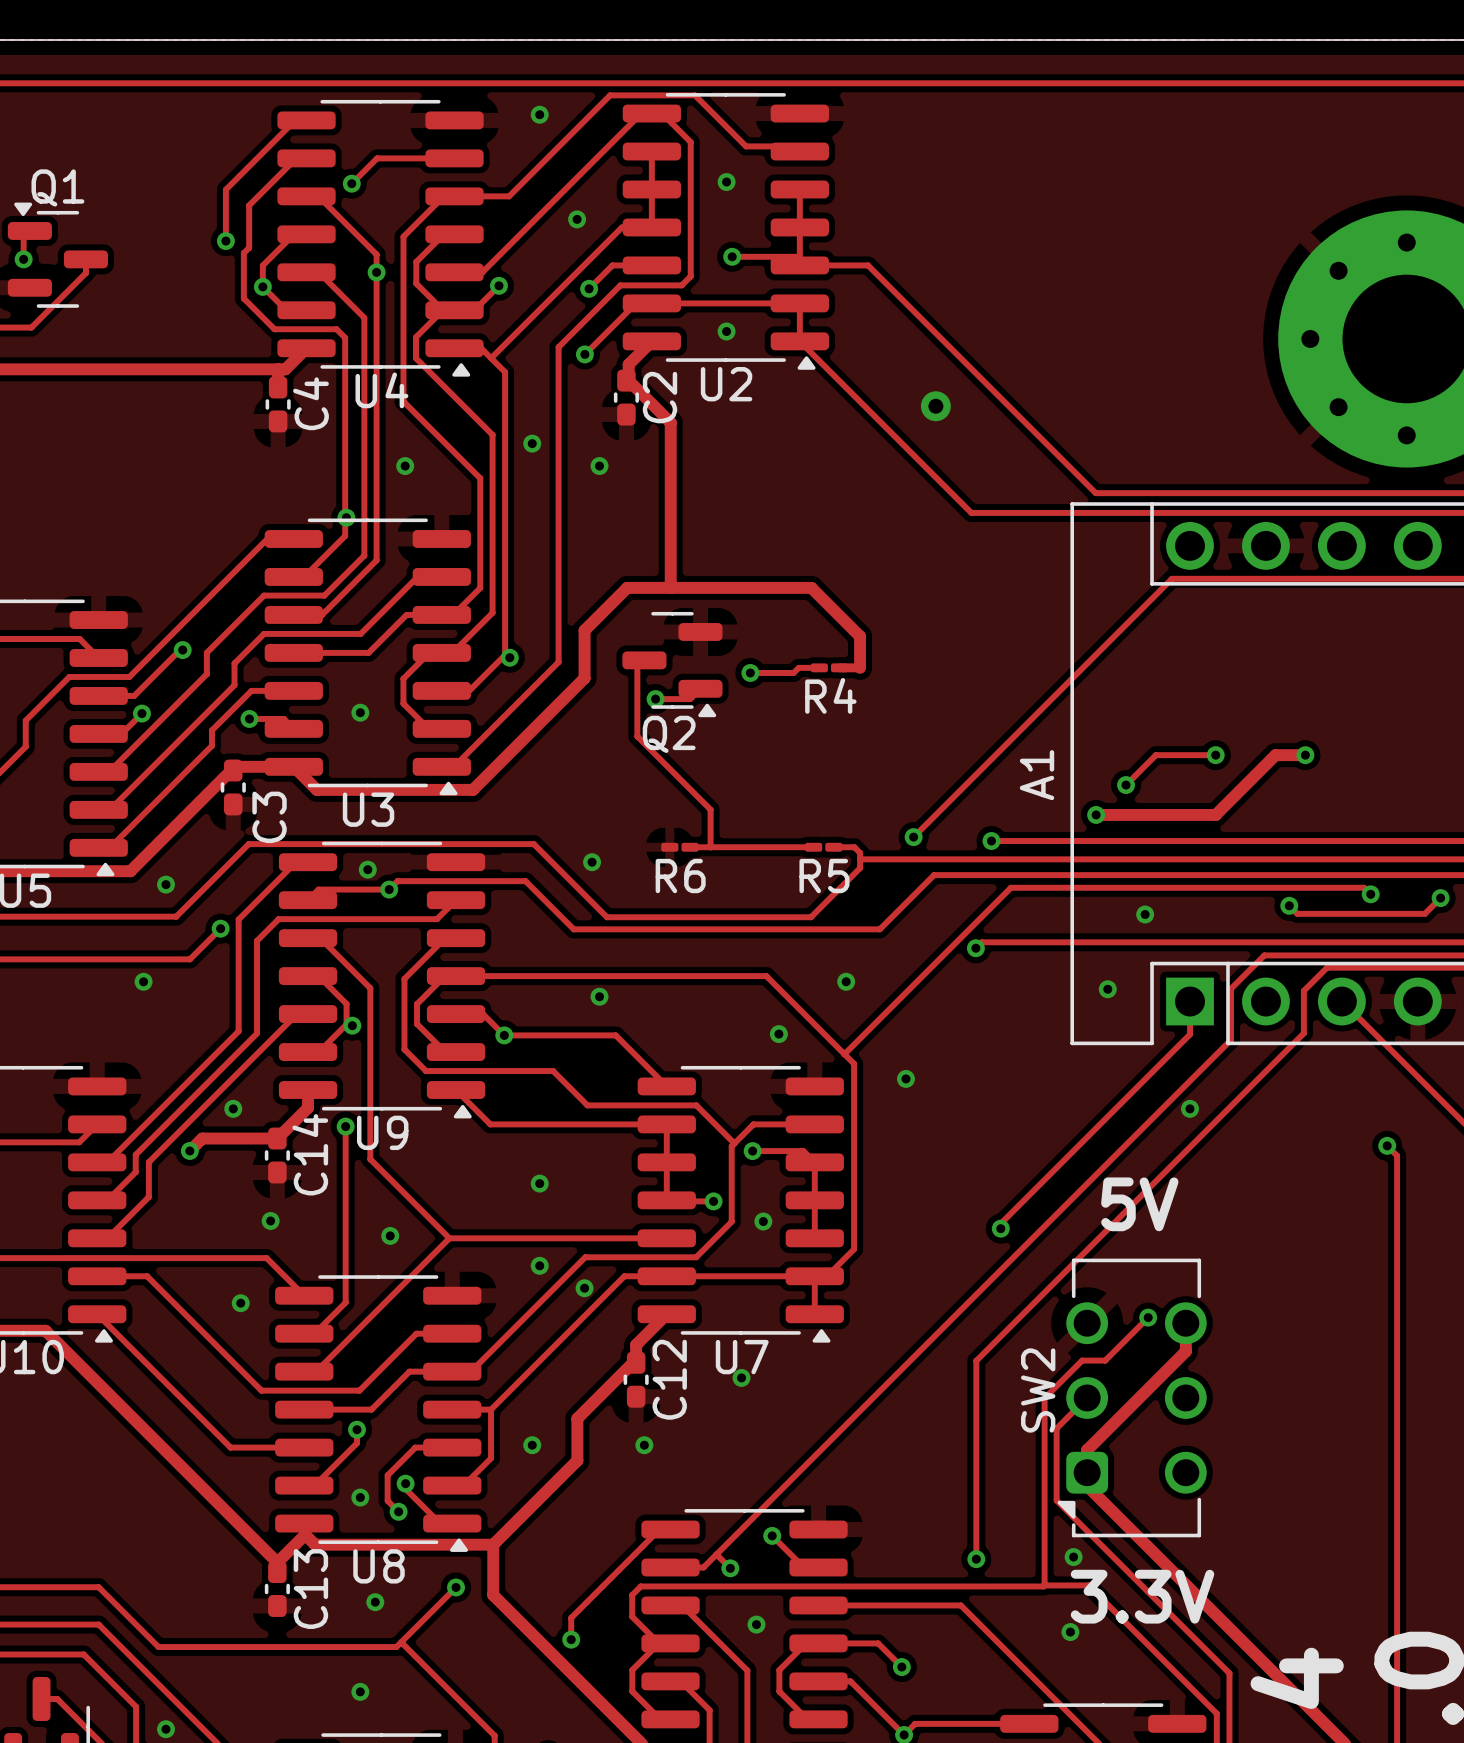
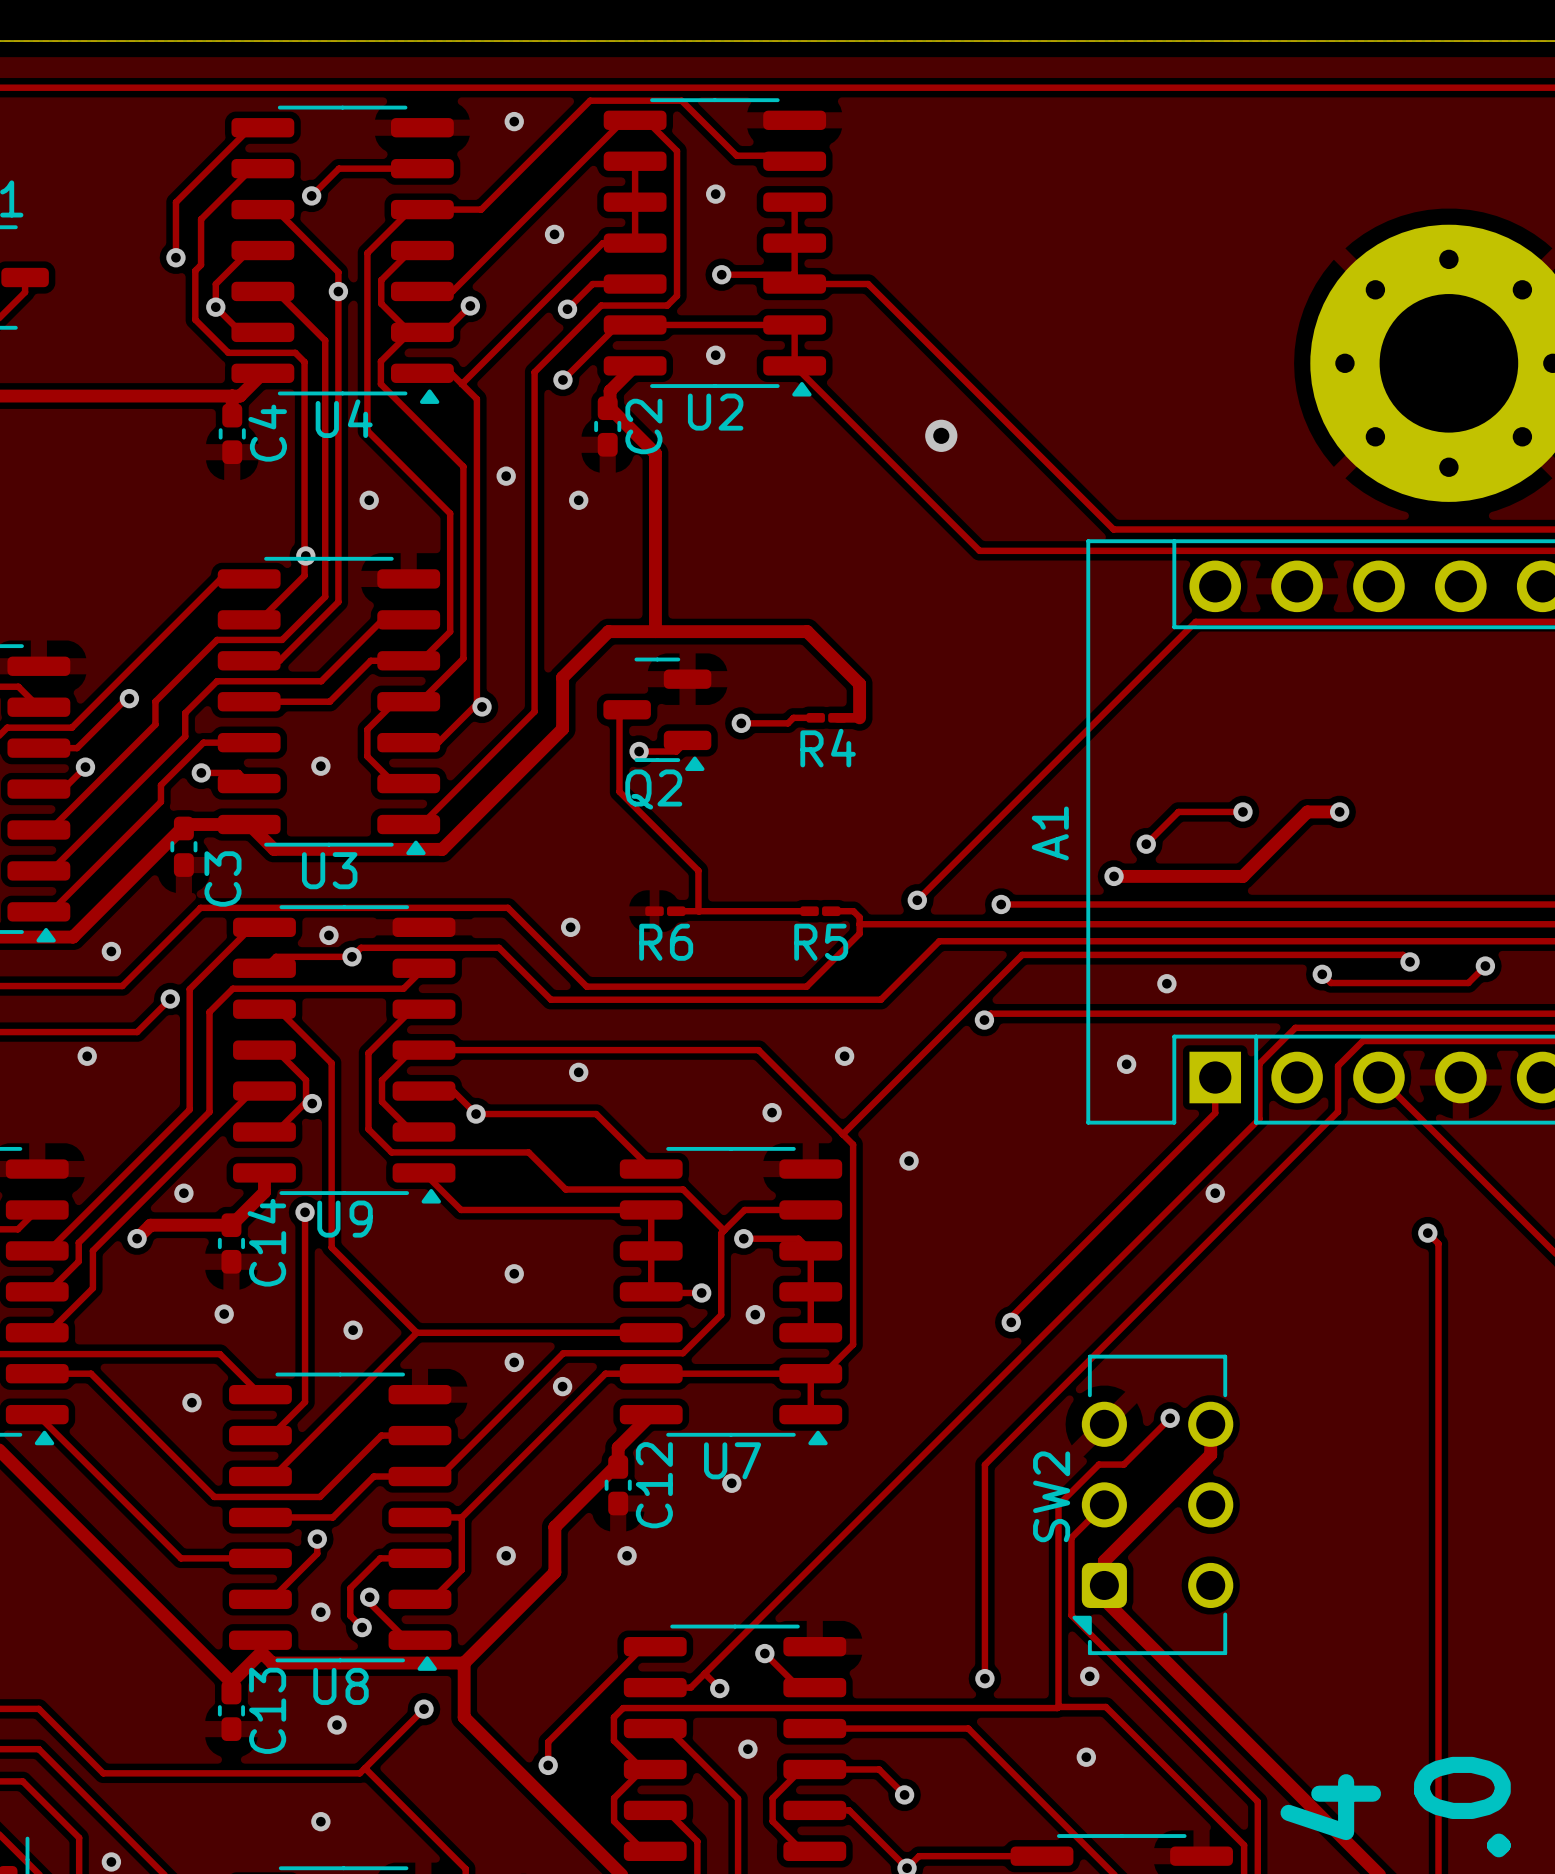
text: 5V (1139, 1204) -> none
text: 3.3V (1142, 1596) -> none

